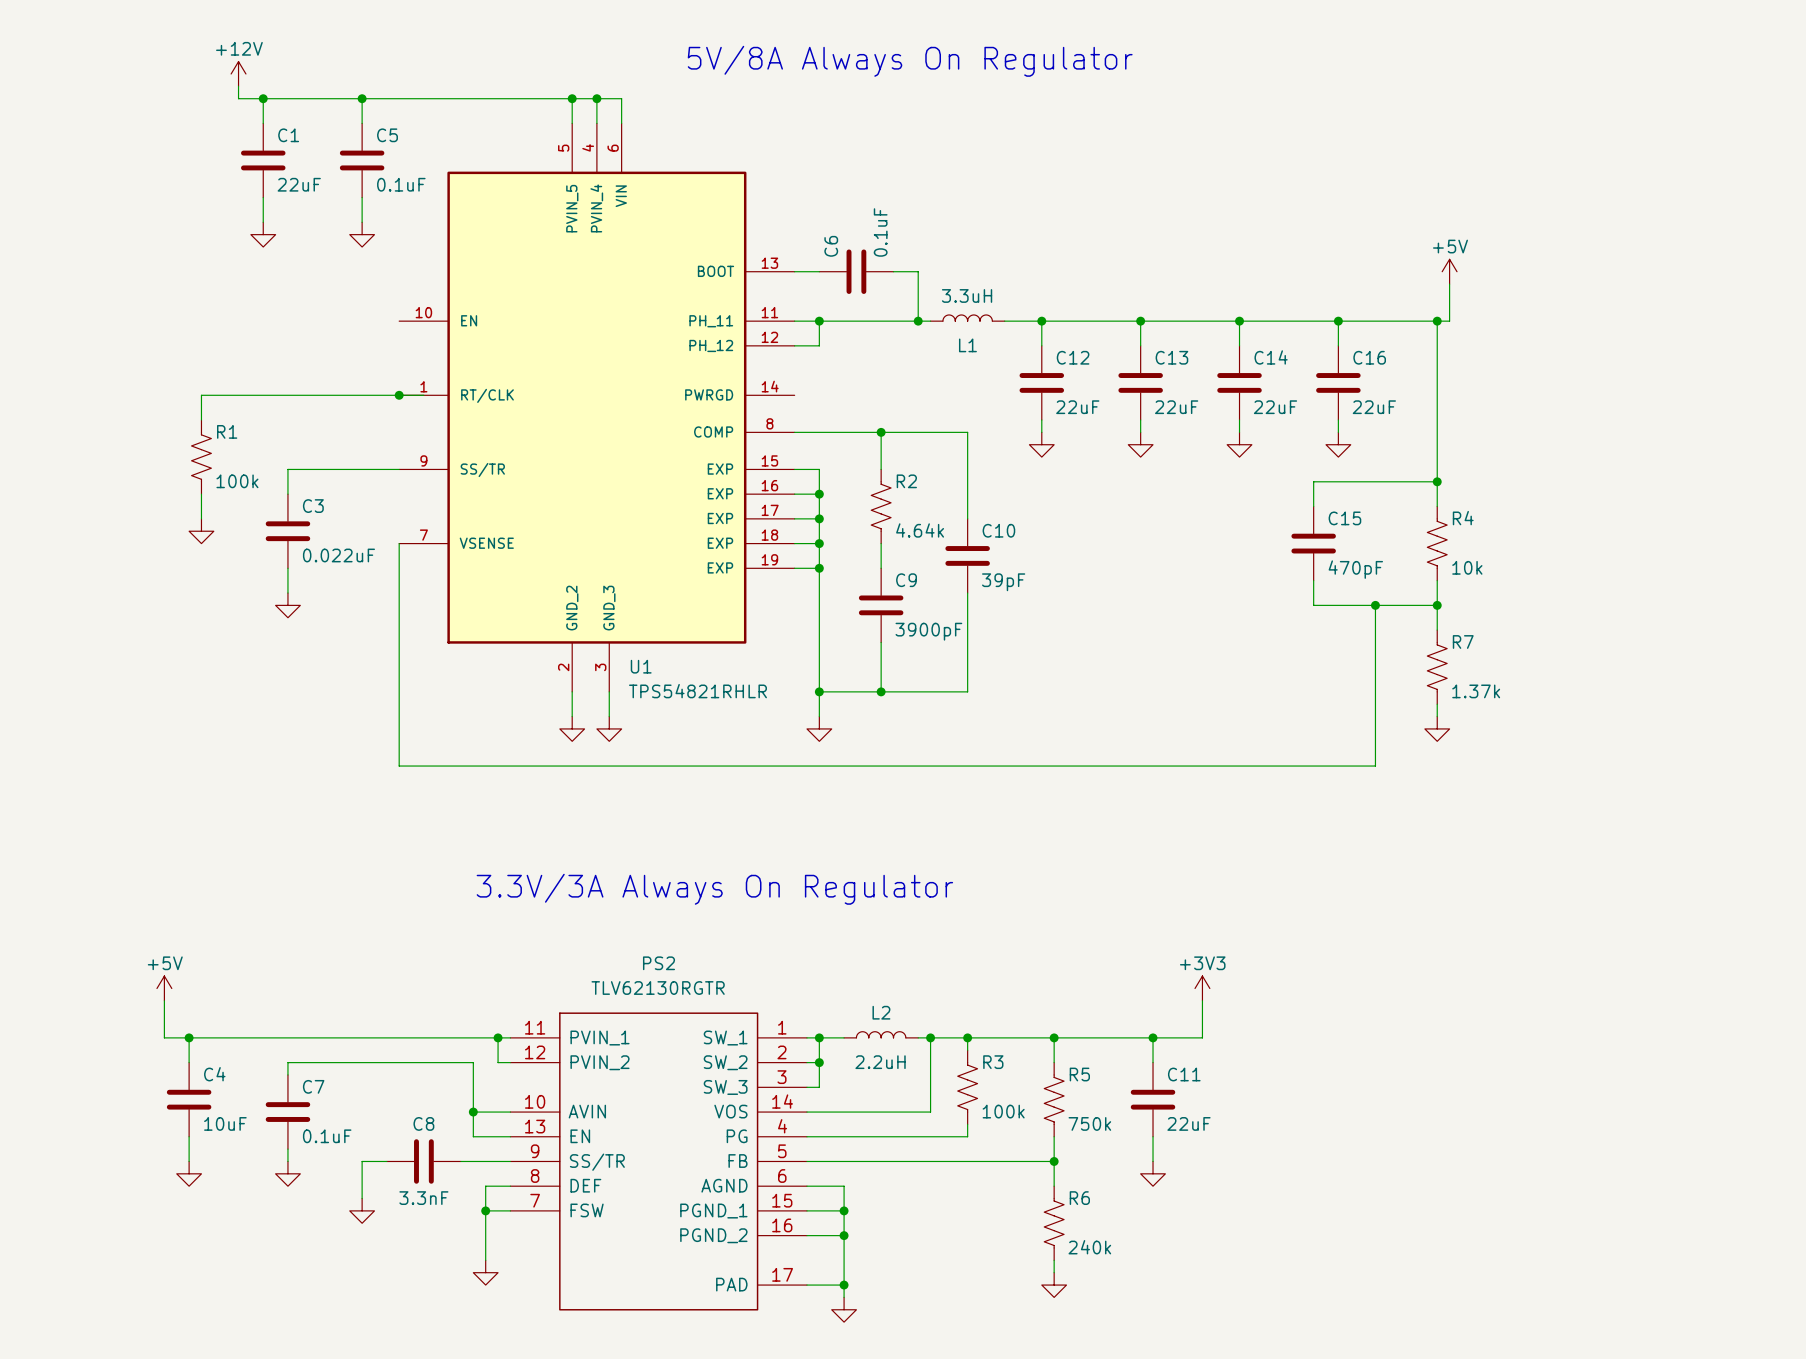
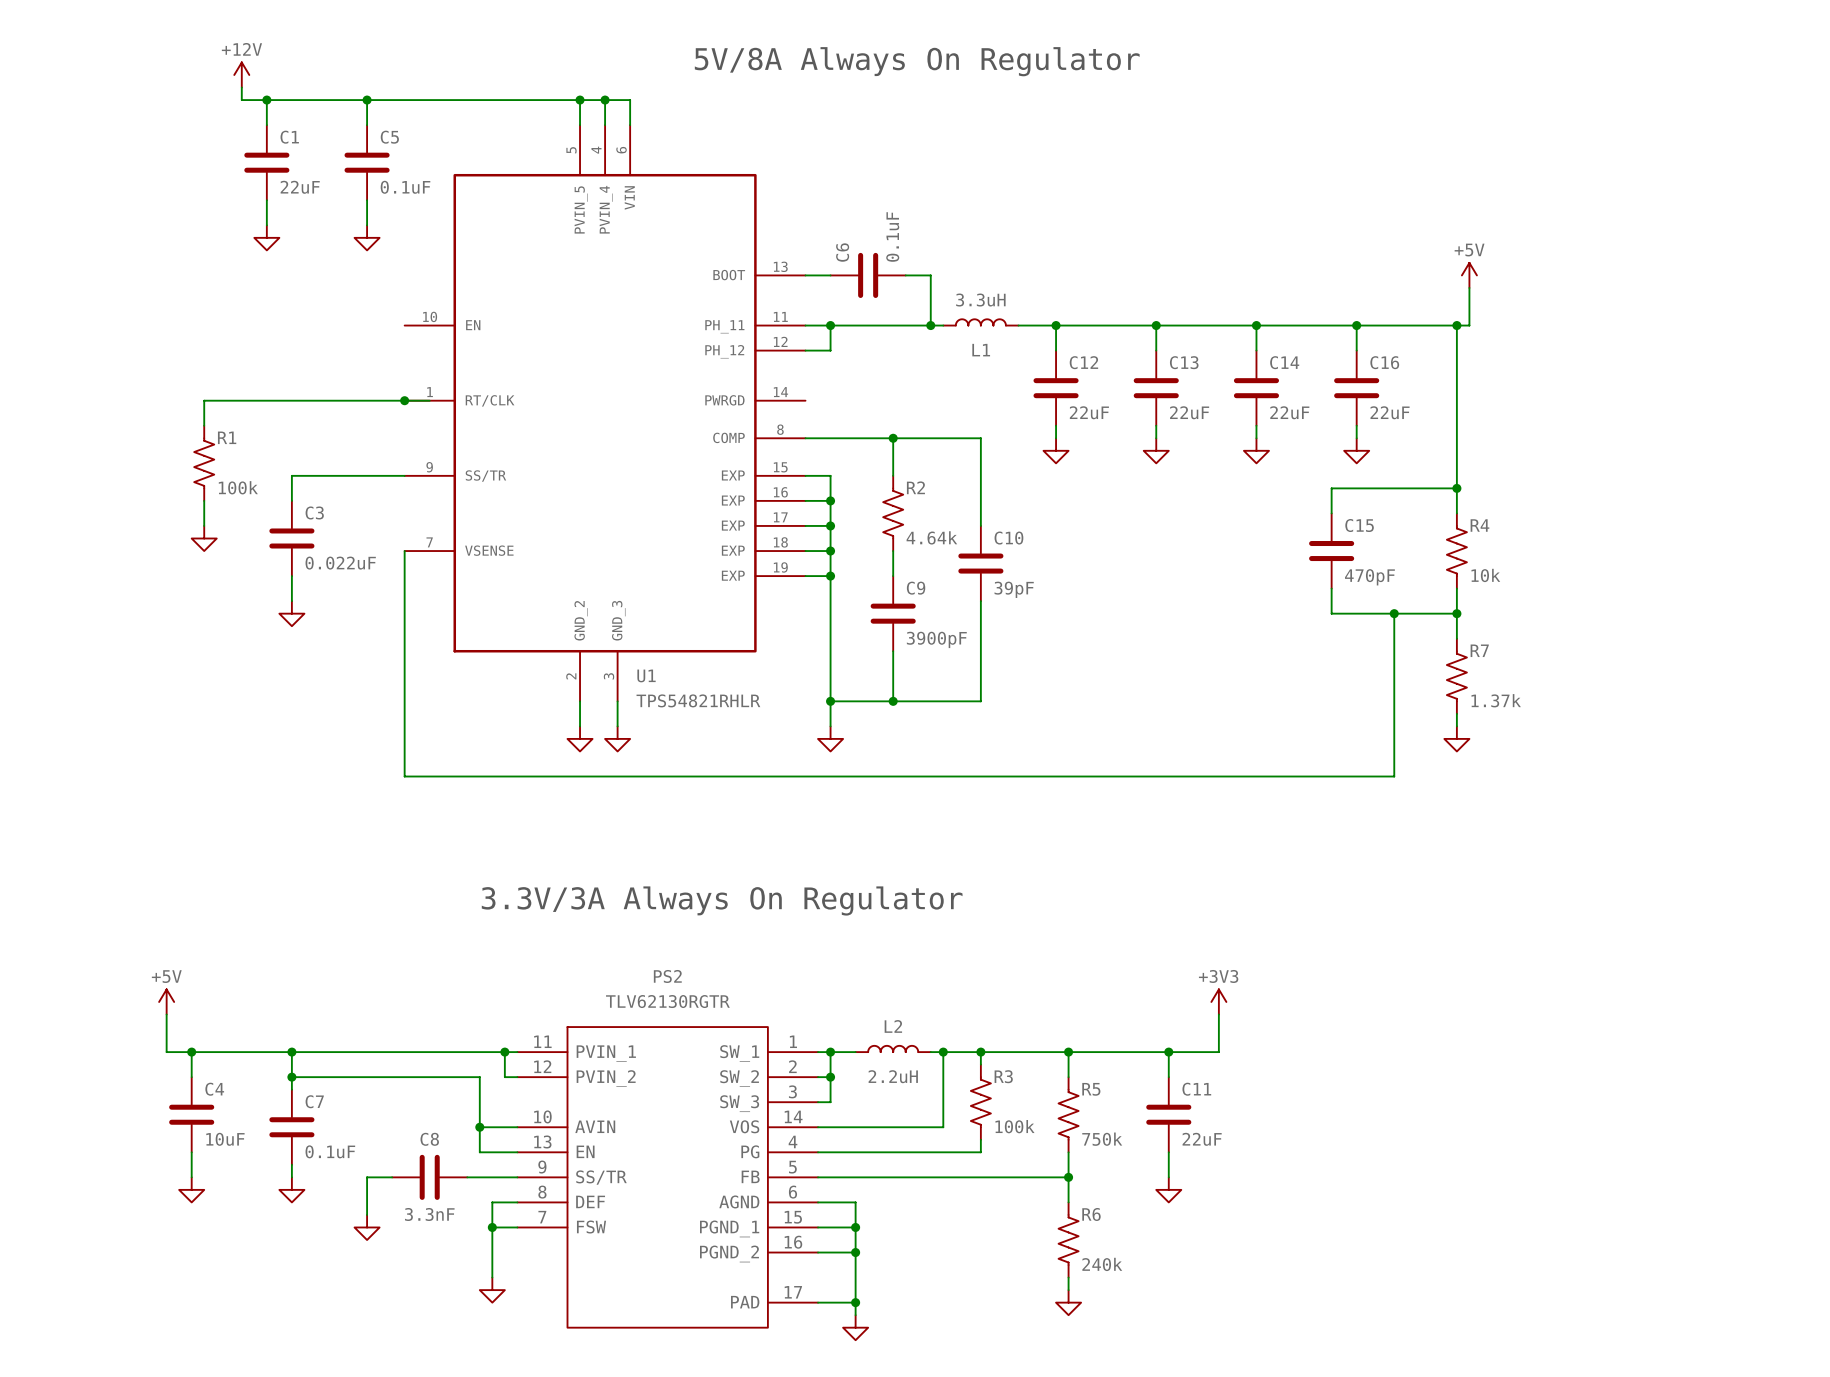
wire: none -> (291, 1052) (291, 1077)
junction: none -> (291, 1052)
junction: none -> (291, 1077)

